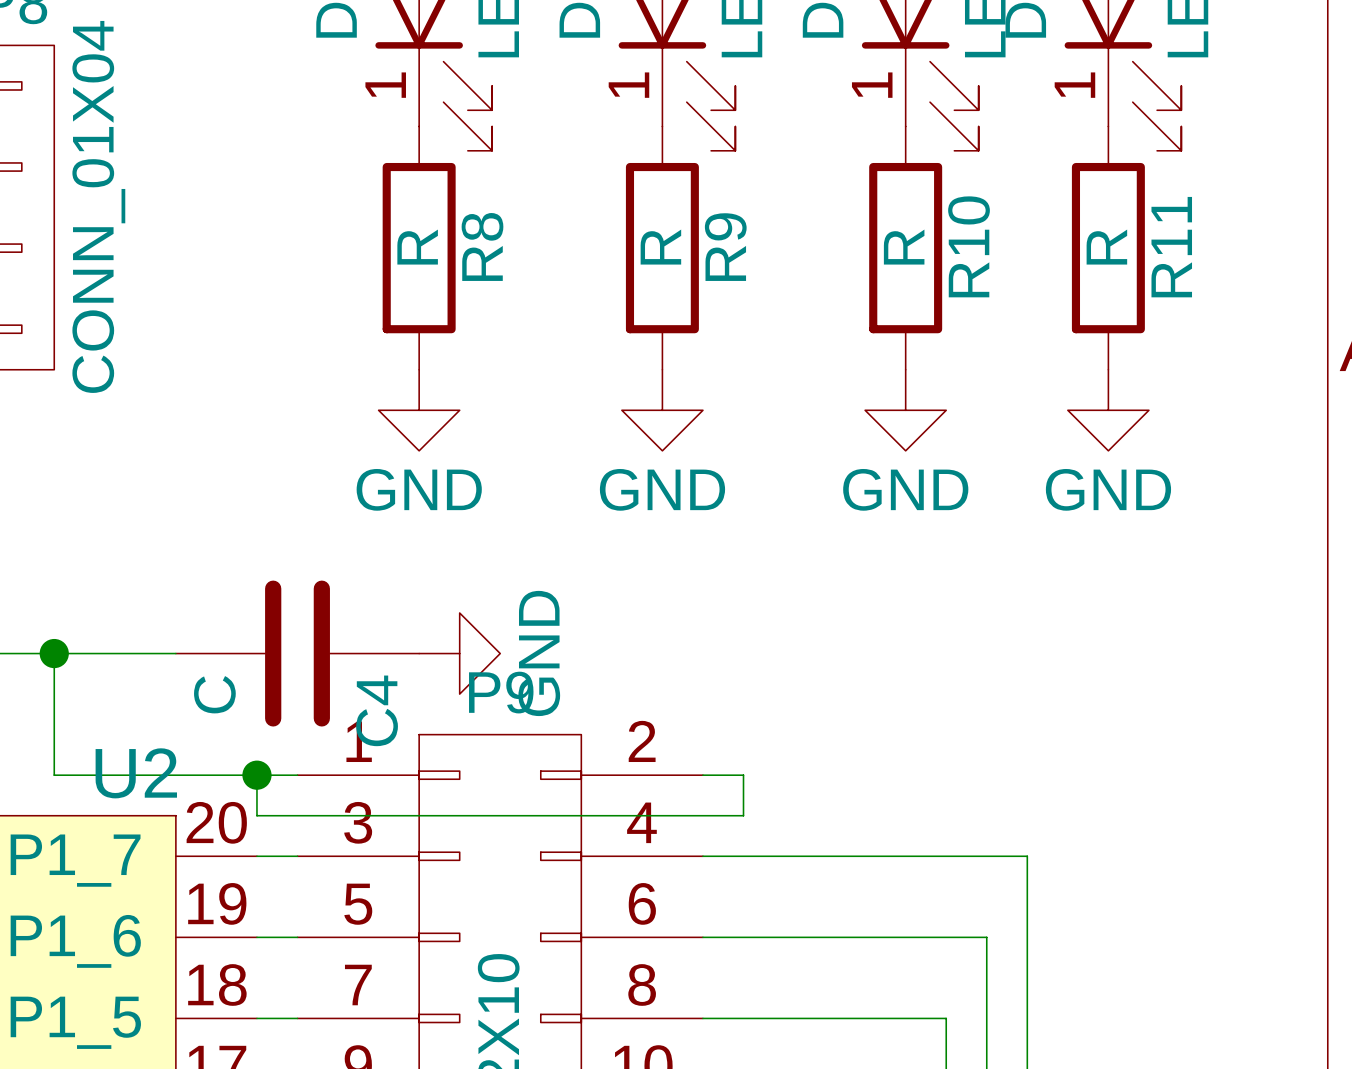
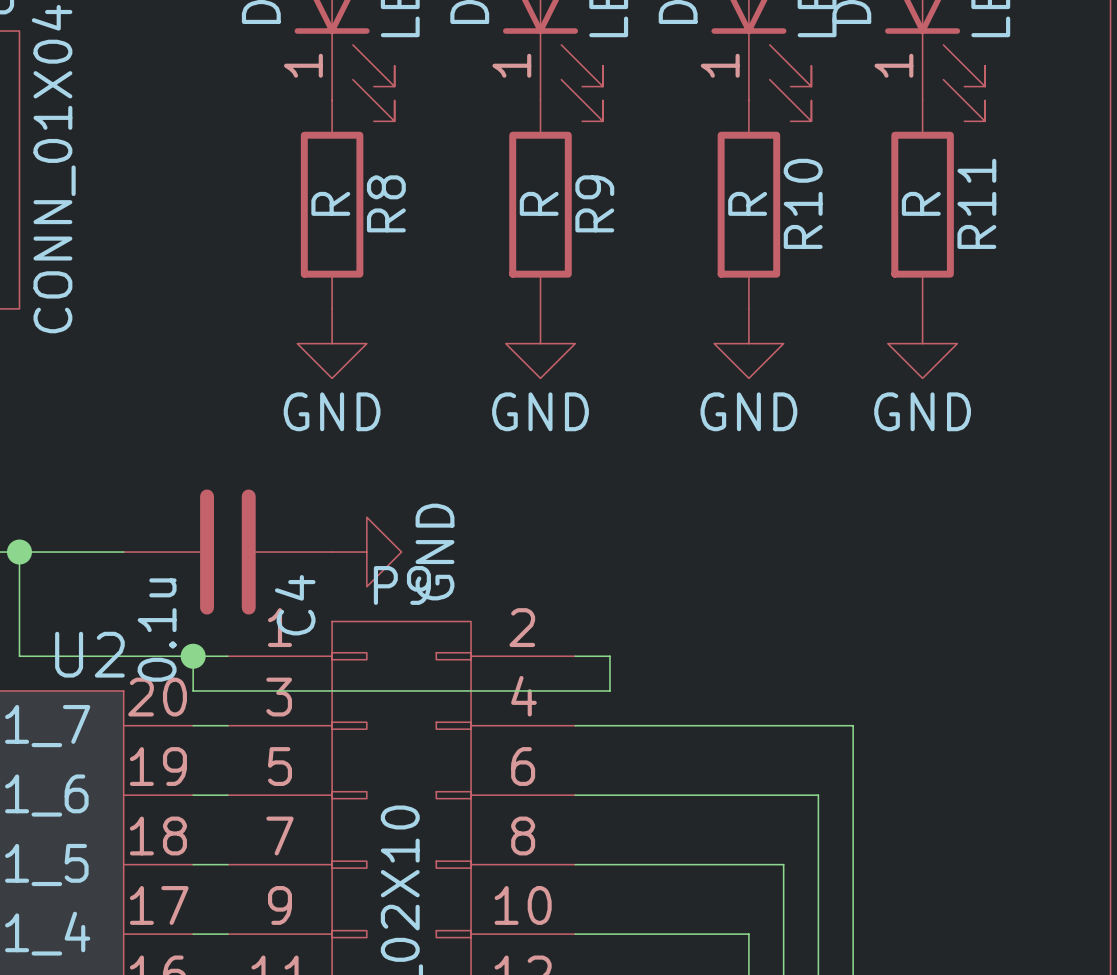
C4 value: C (214, 694) -> 0.1u (157, 630)

